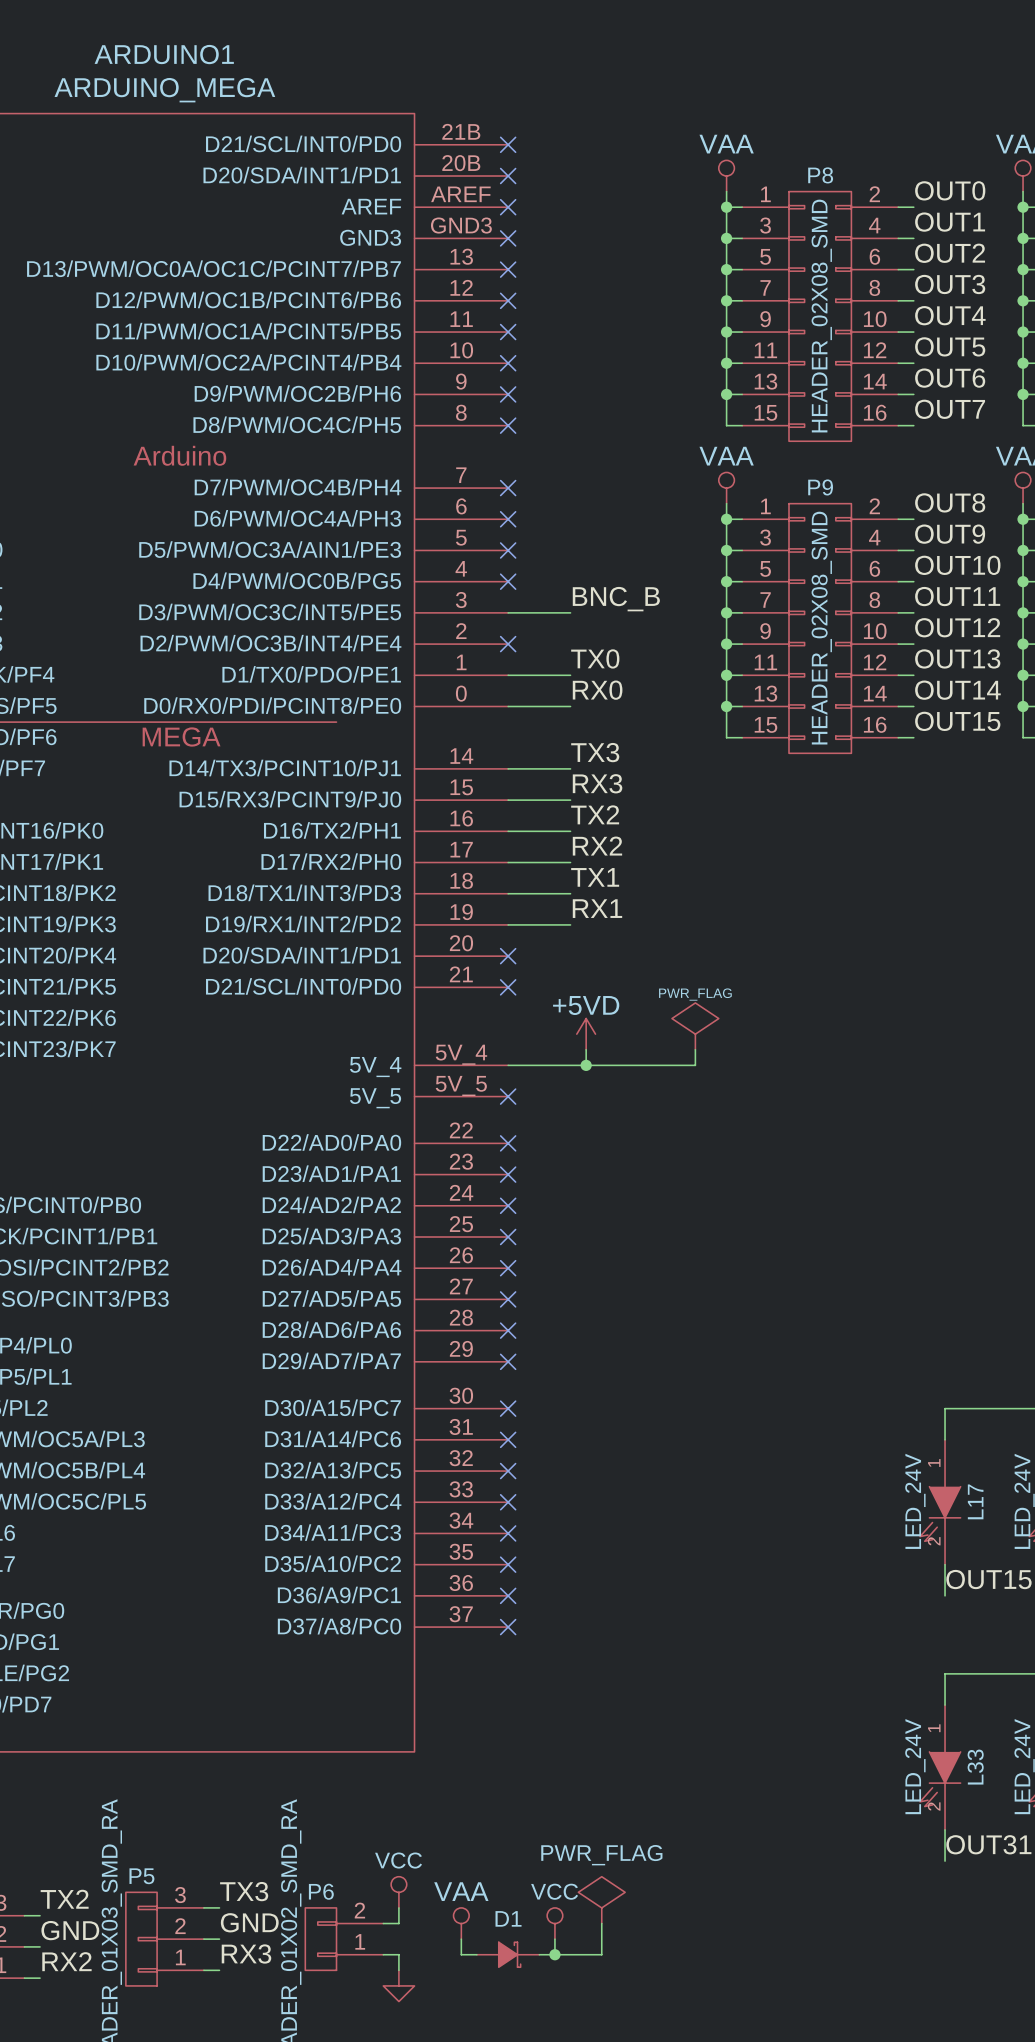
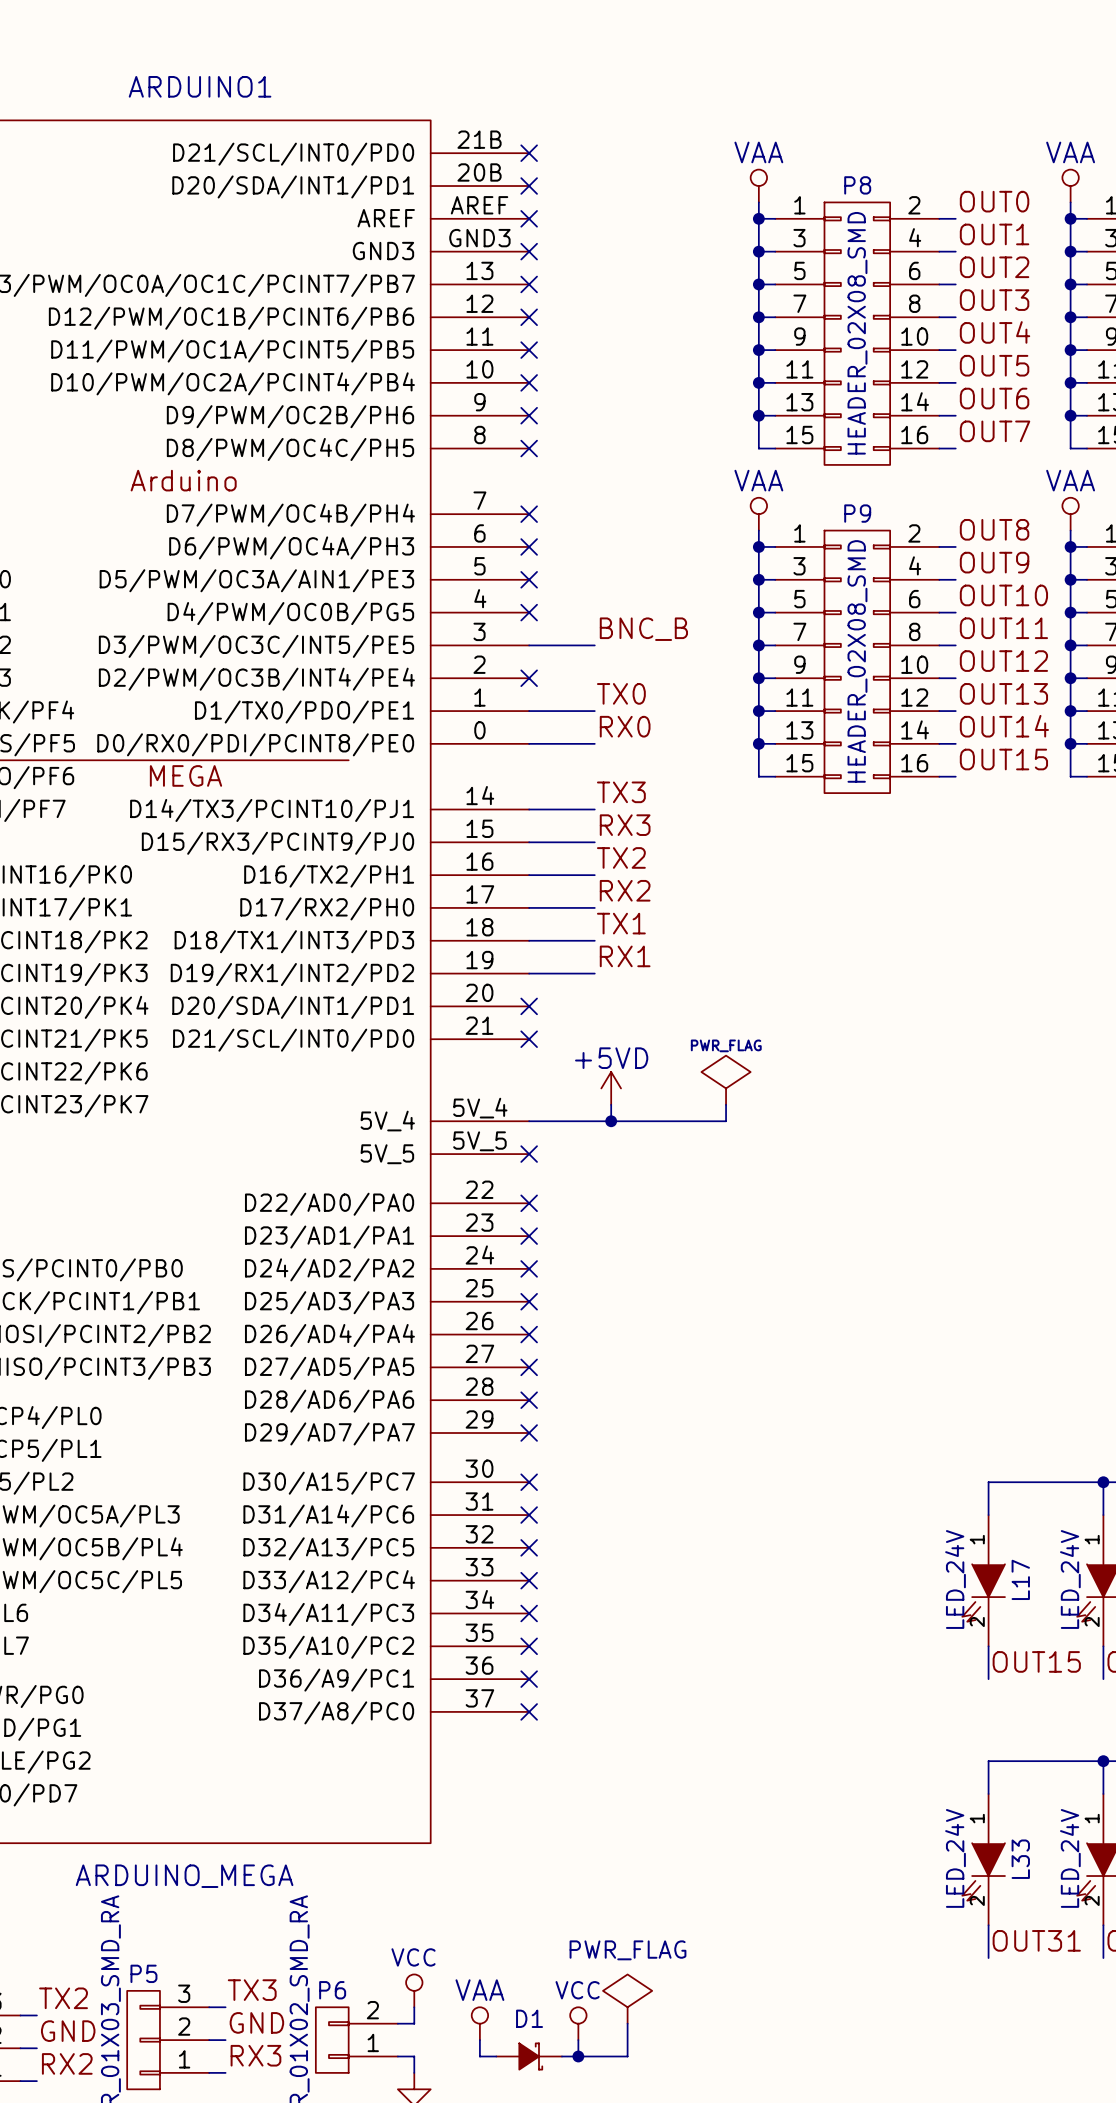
ARDUINO1 name position: ARDUINO1 (164, 54) -> ARDUINO1 (200, 86)
ARDUINO1 value position: ARDUINO_MEGA (164, 90) -> ARDUINO_MEGA (184, 1876)

